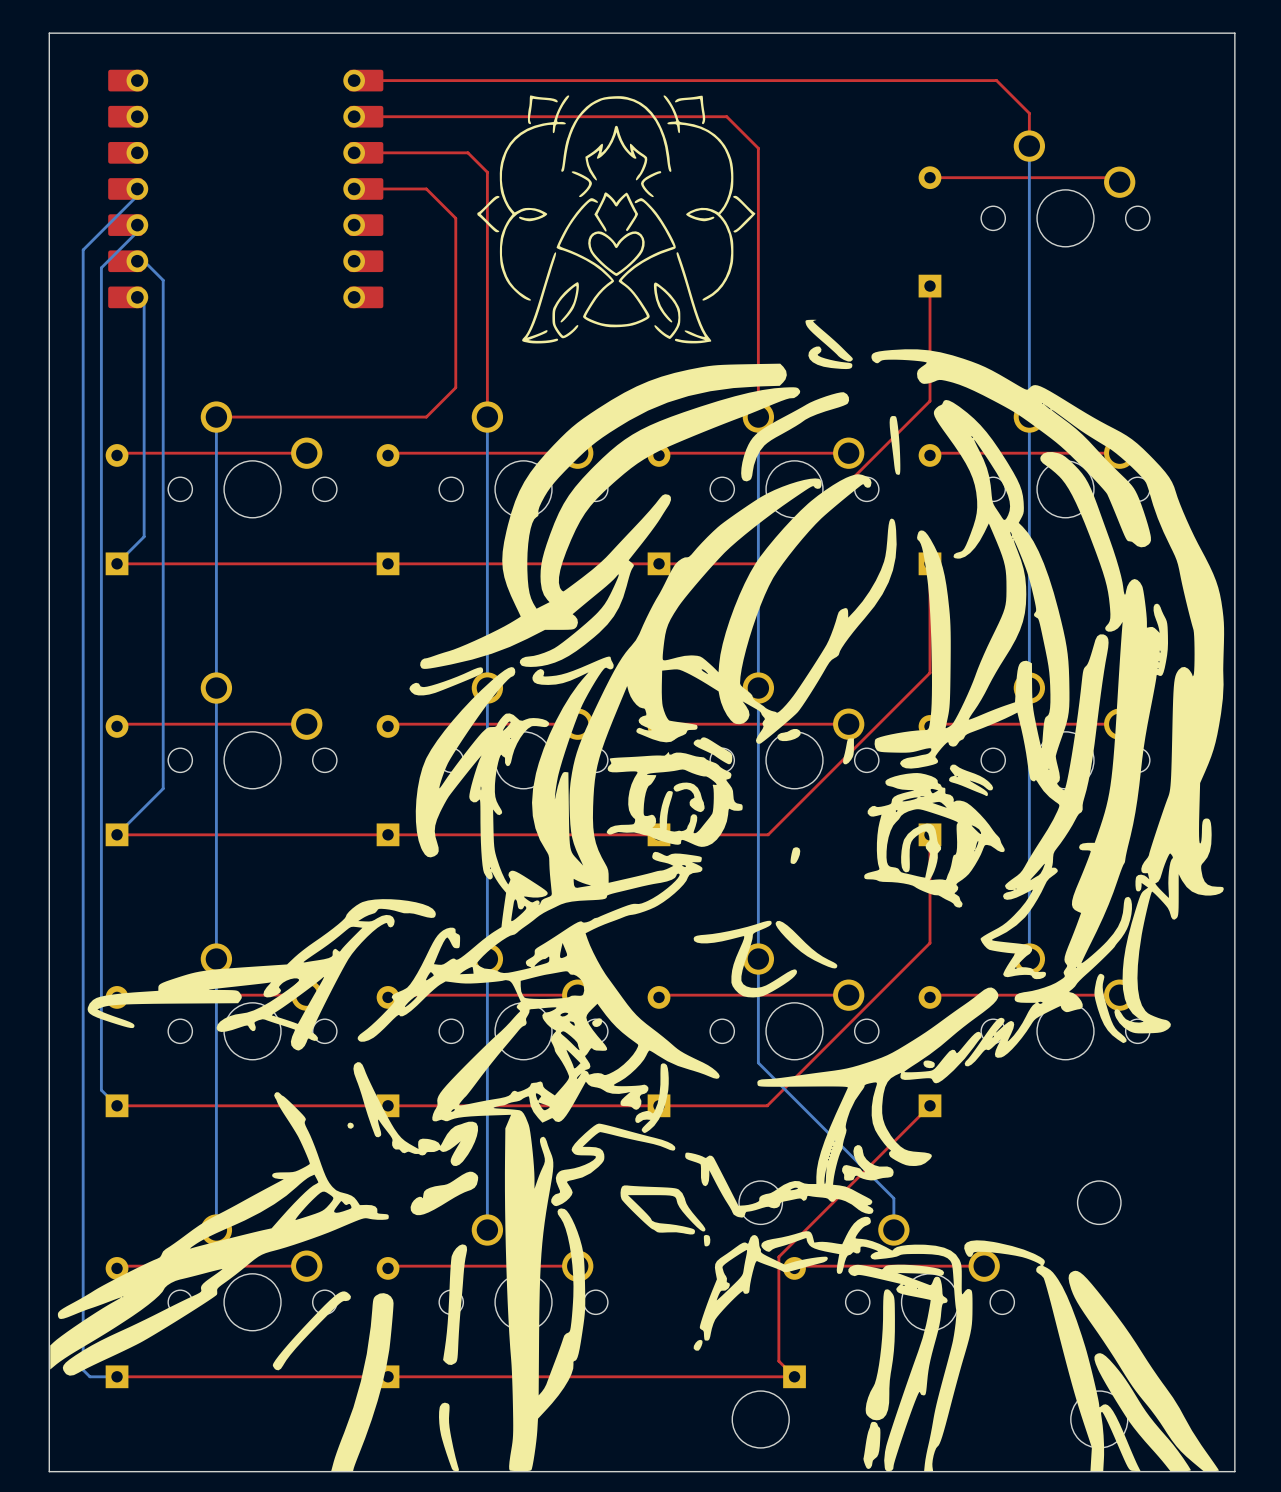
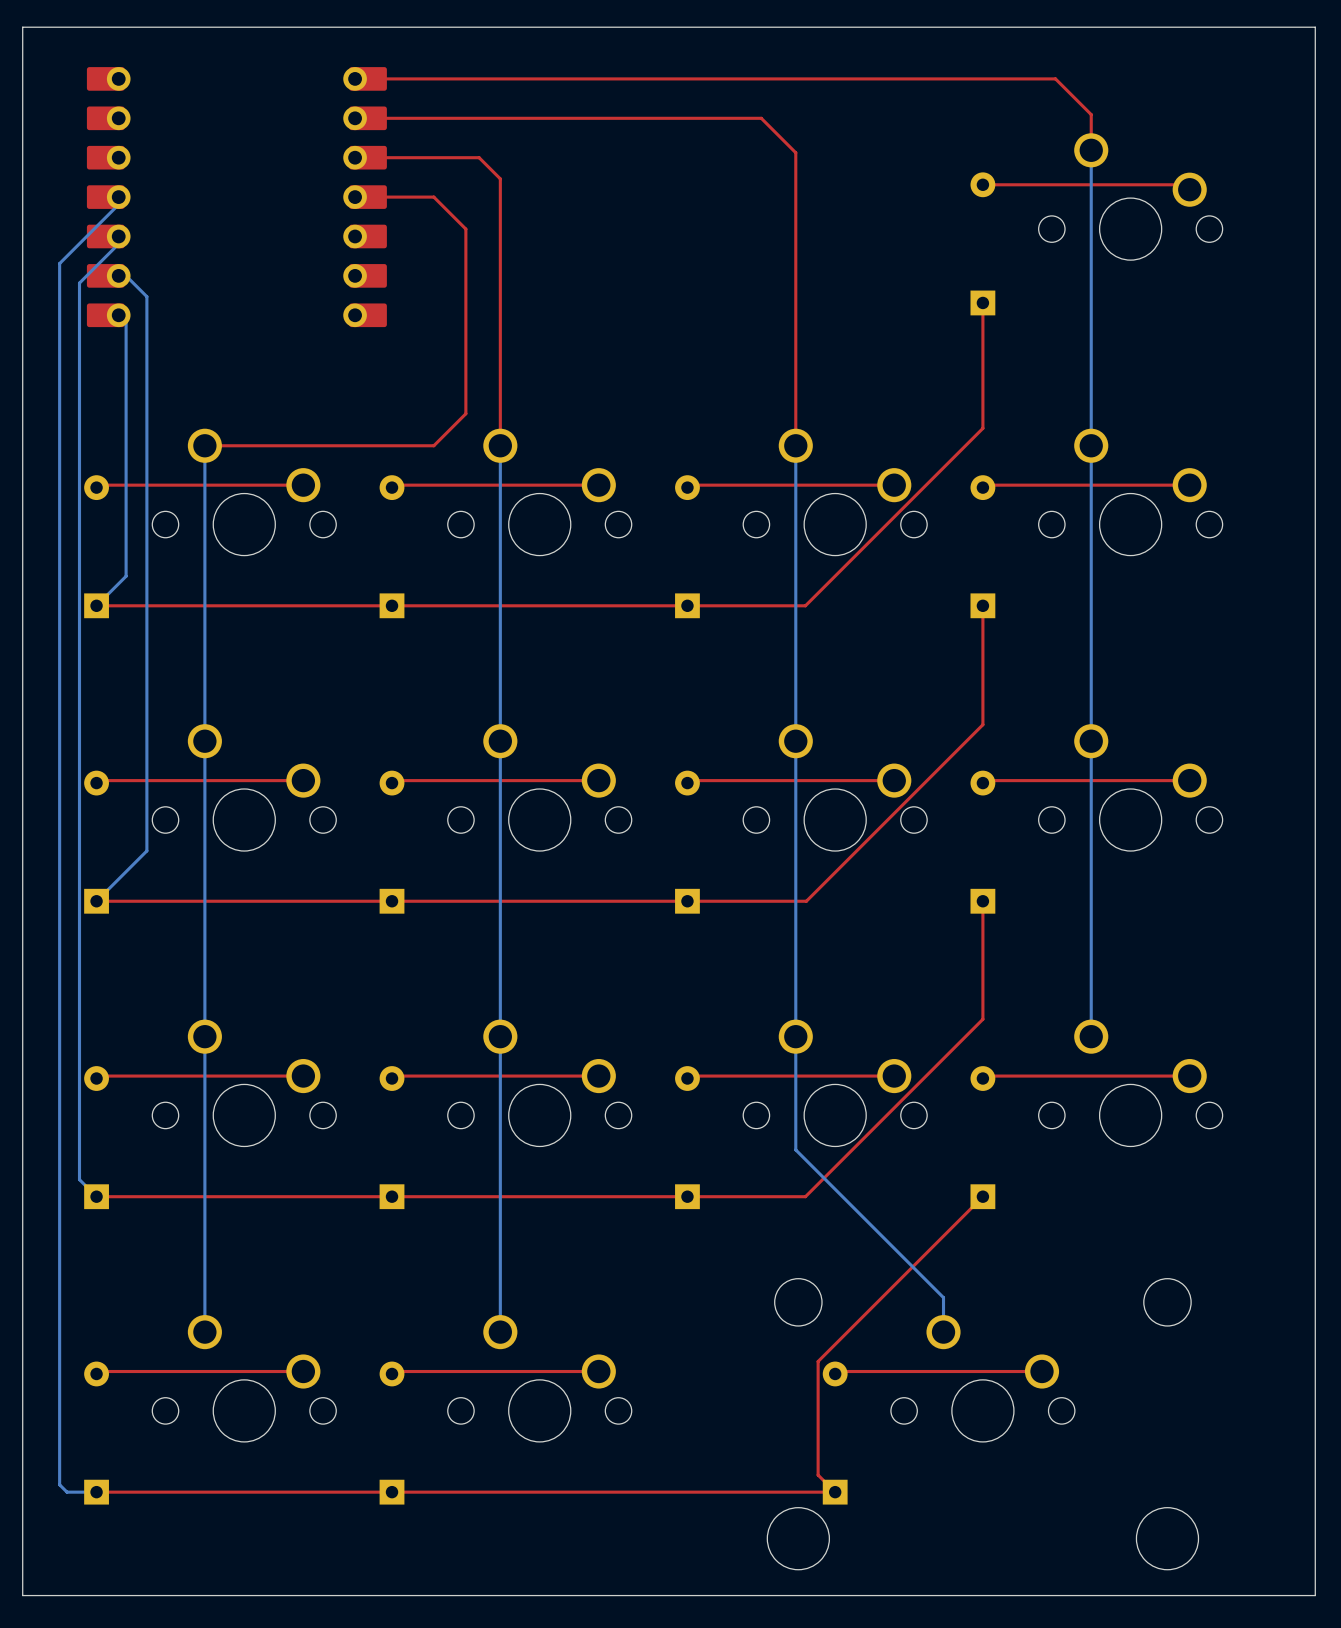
drawing: [50, 95, 1225, 1472] -> none

